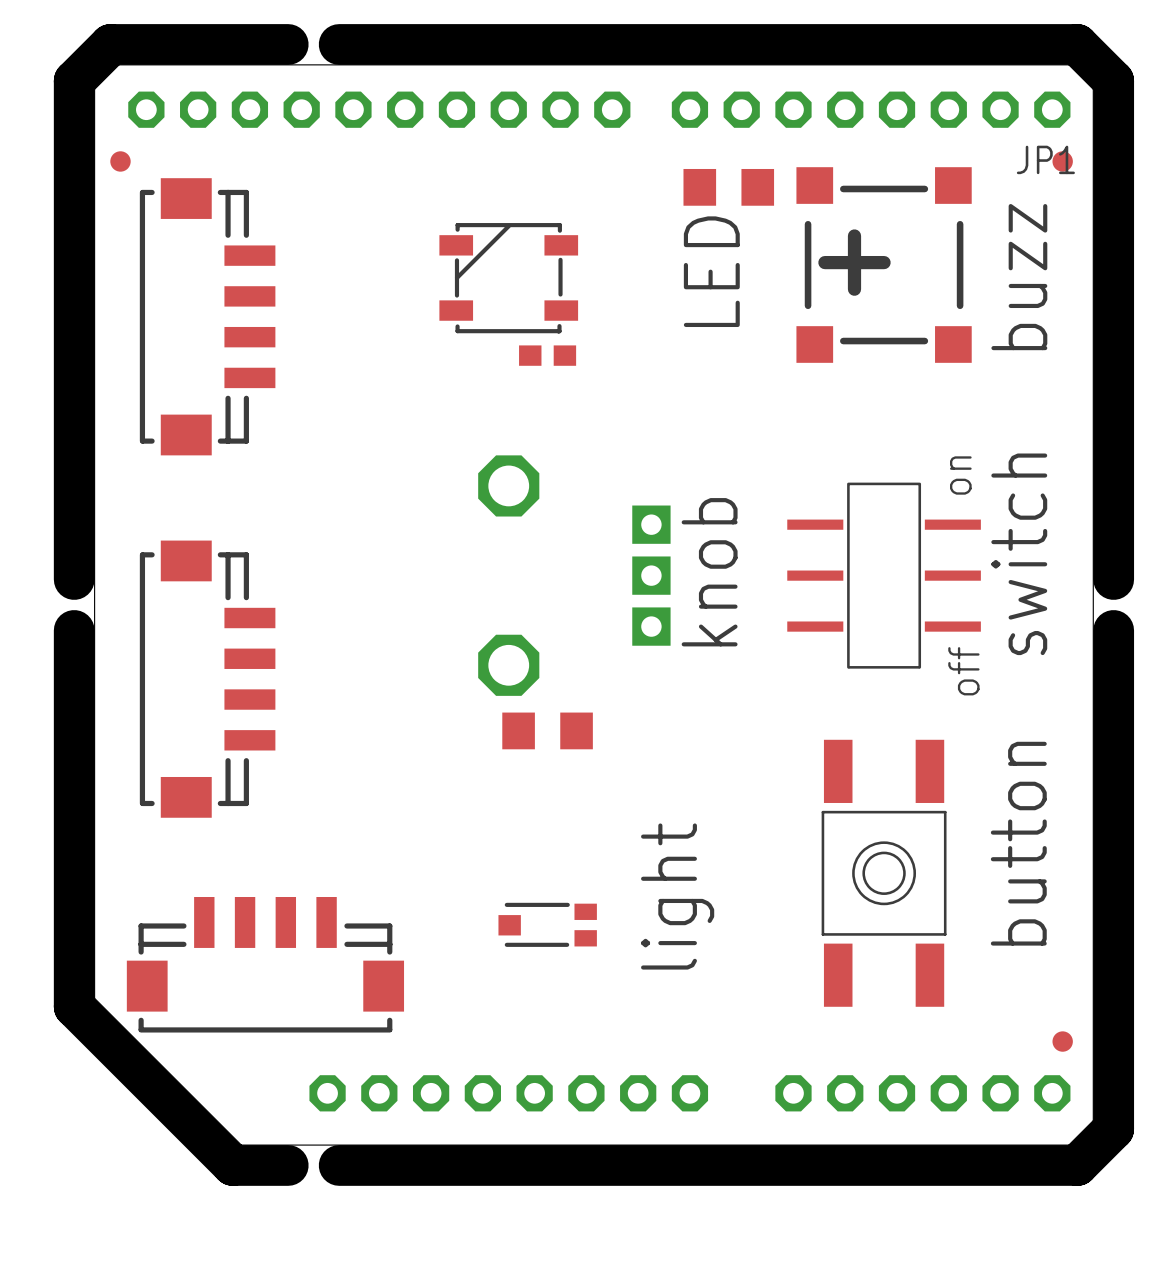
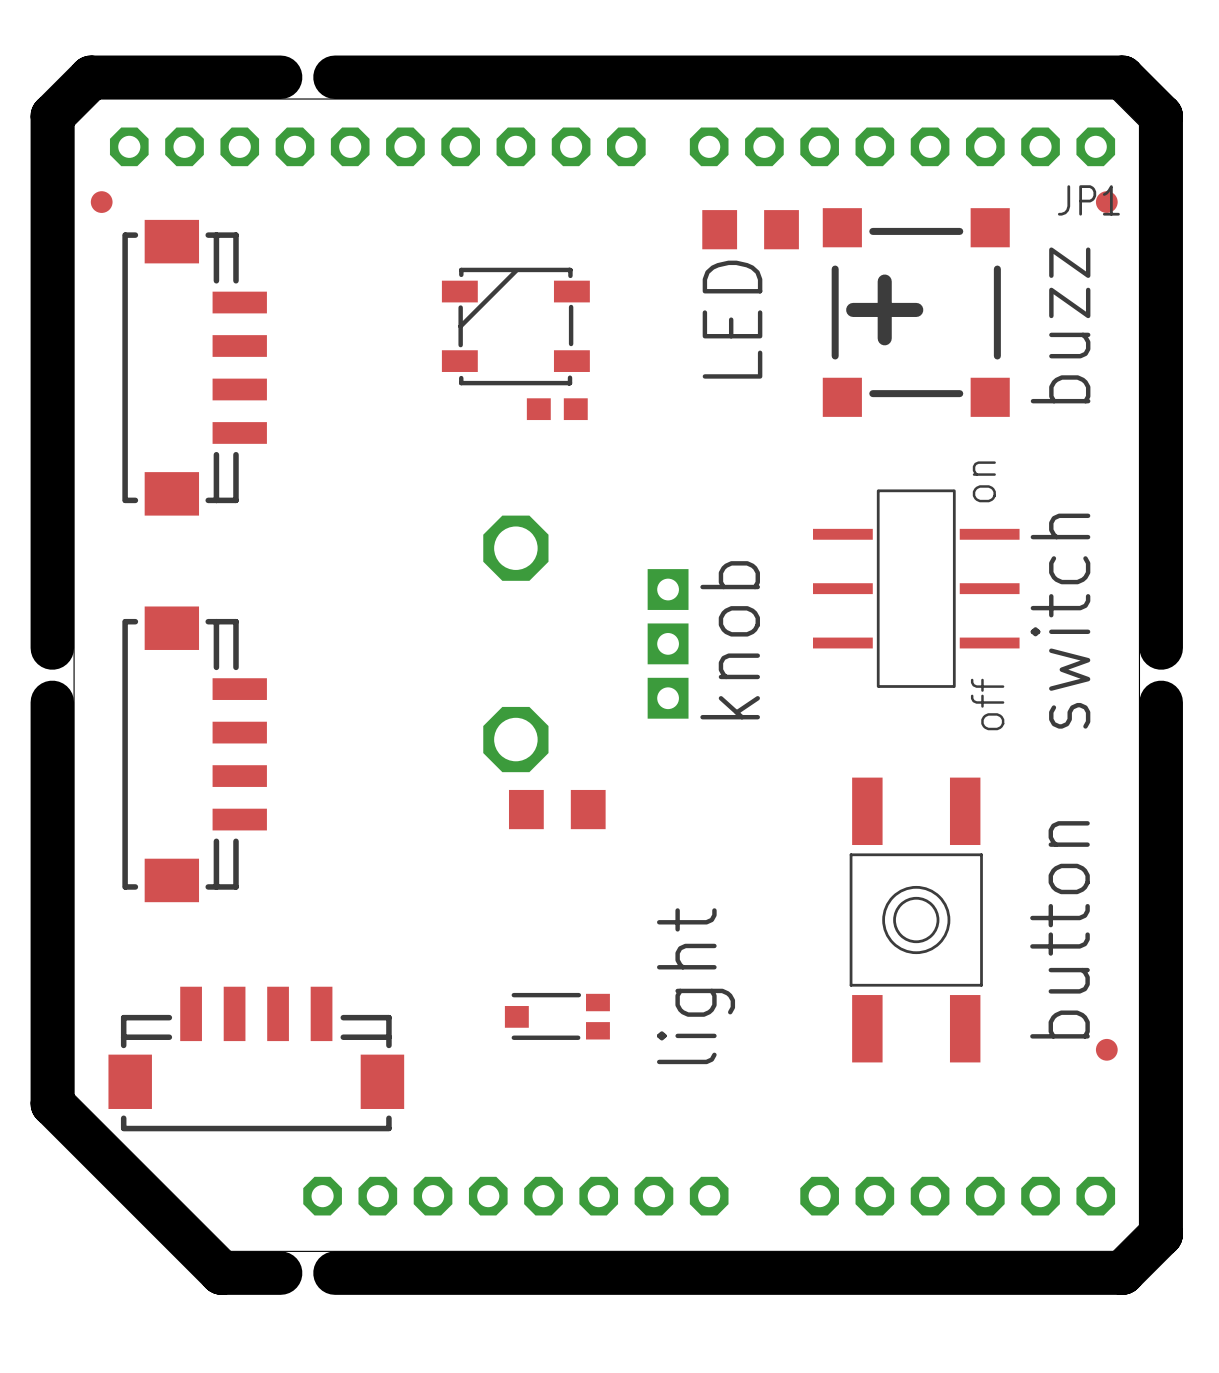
text position: on (960, 475) -> on (984, 481)
part position: (884, 575) -> (916, 588)
text position: off (963, 671) -> off (987, 704)
part position: (884, 873) -> (916, 920)
part position: (1062, 1041) -> (1106, 1049)

